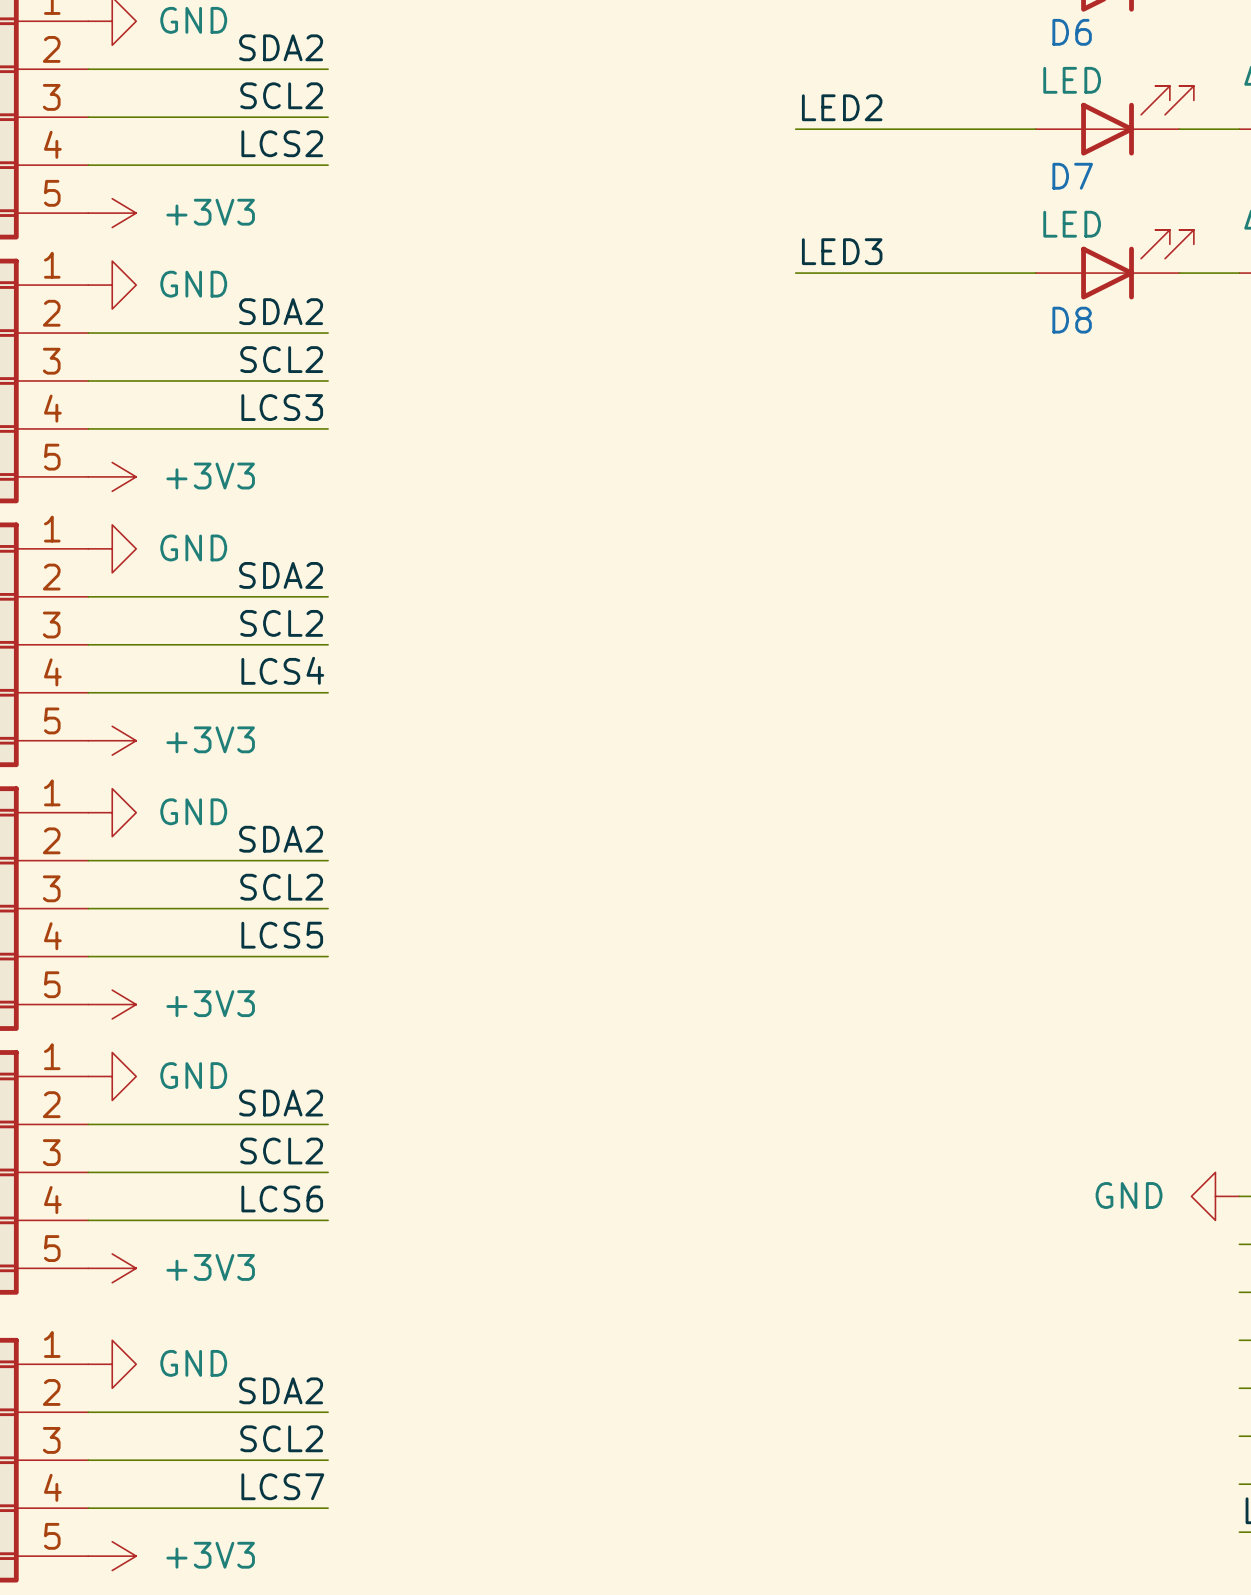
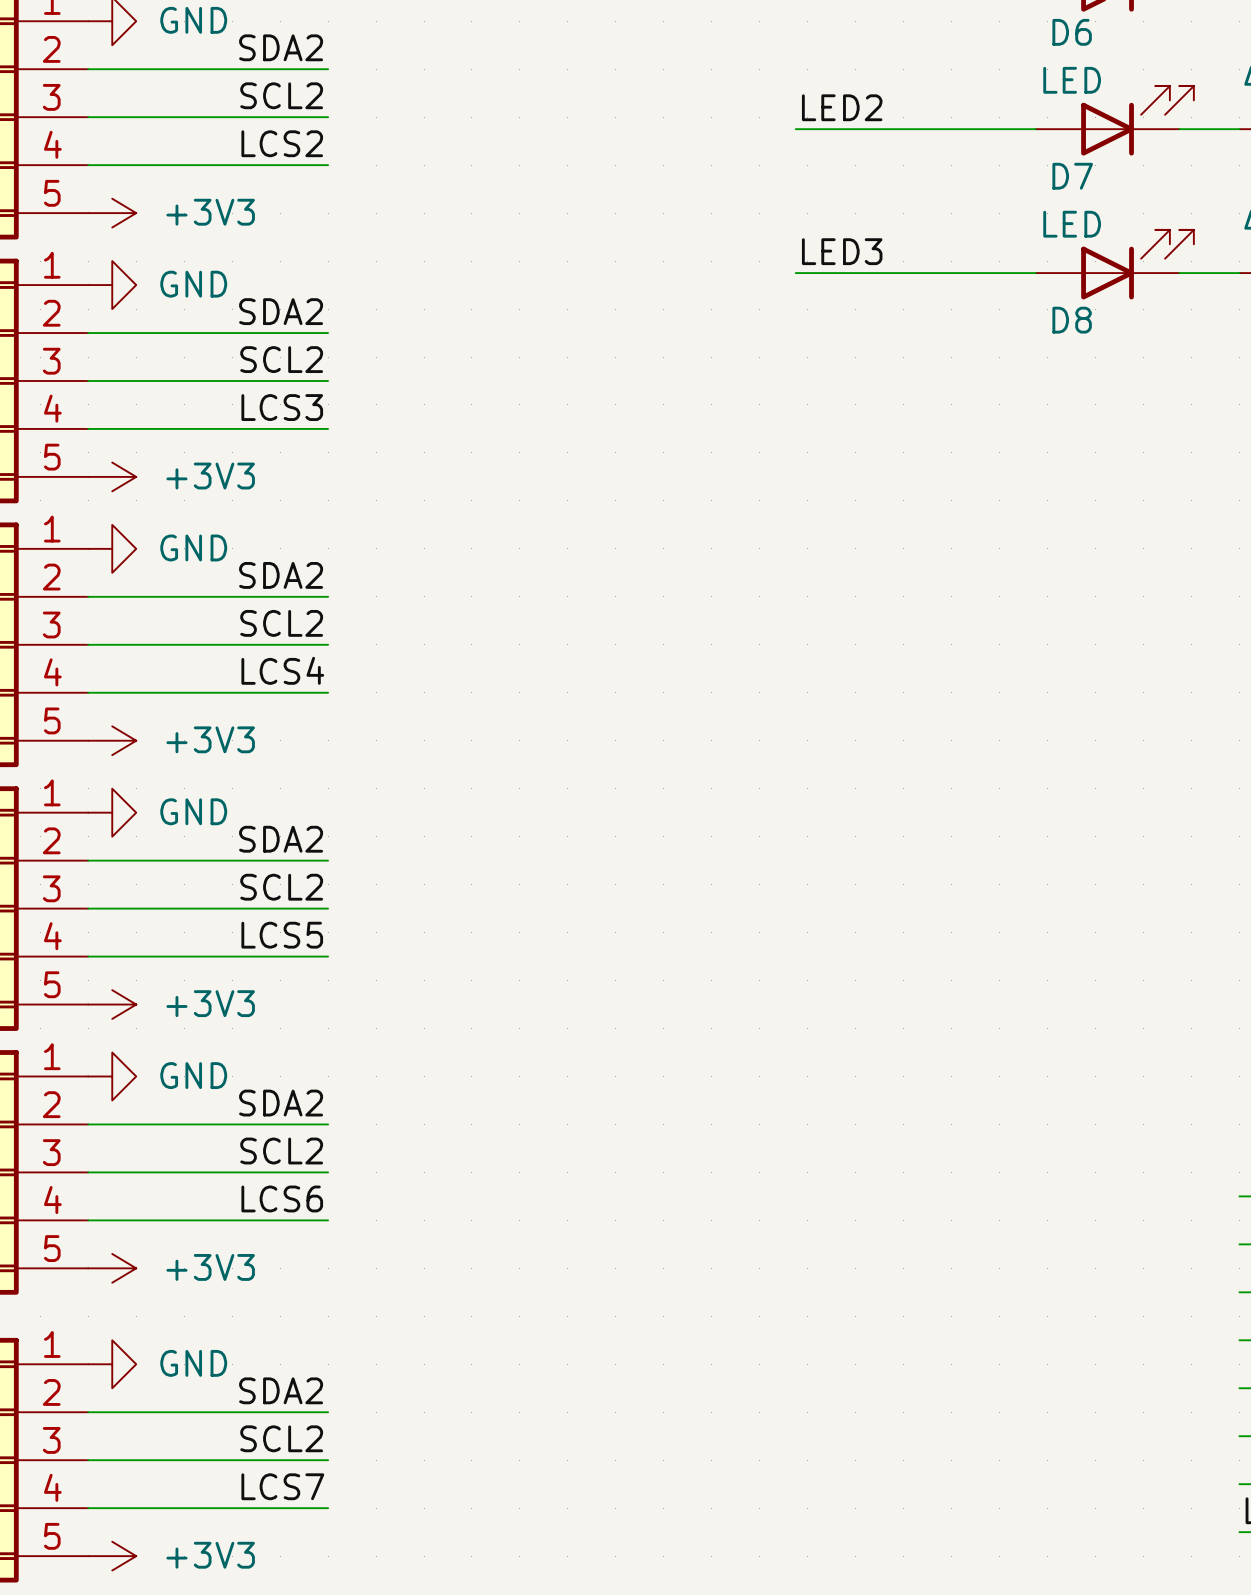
power symbol: GND (1215, 1196) -> none

